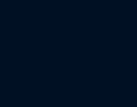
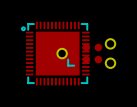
part: none -> (55, 53)
part: none -> (86, 53)

